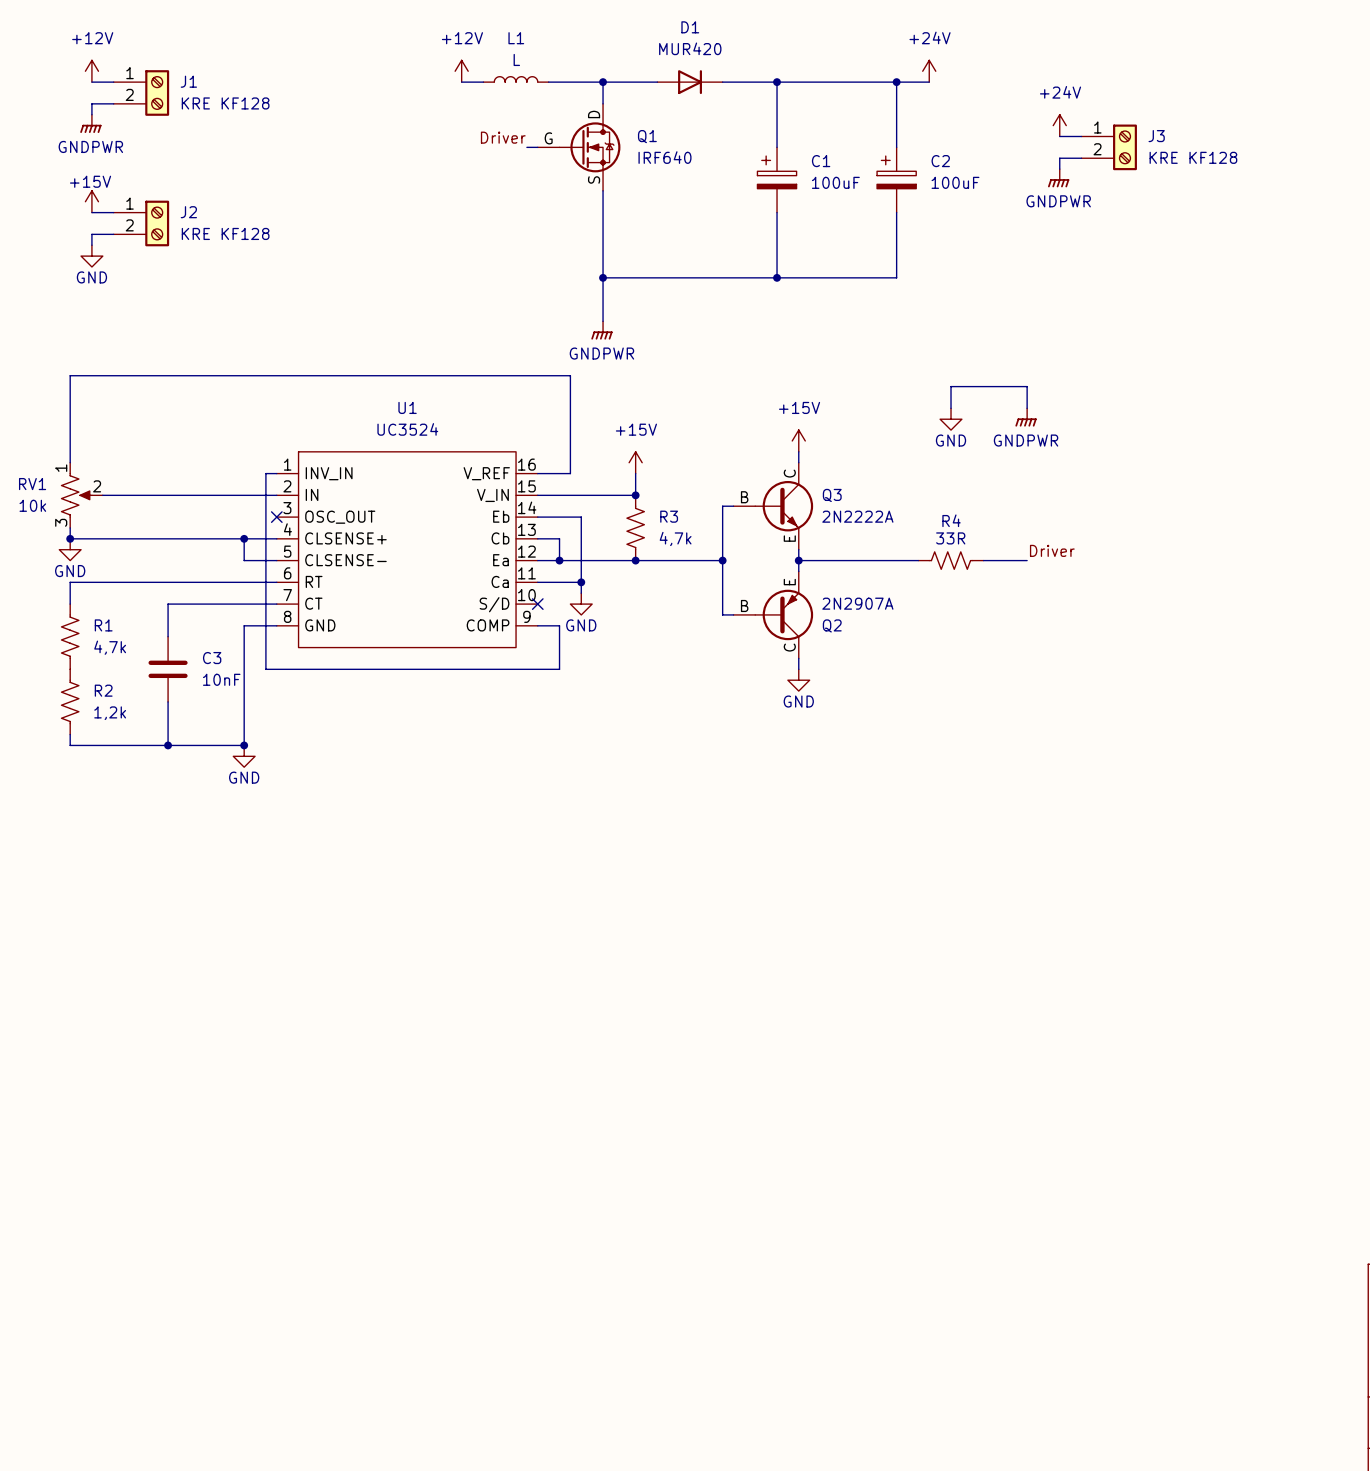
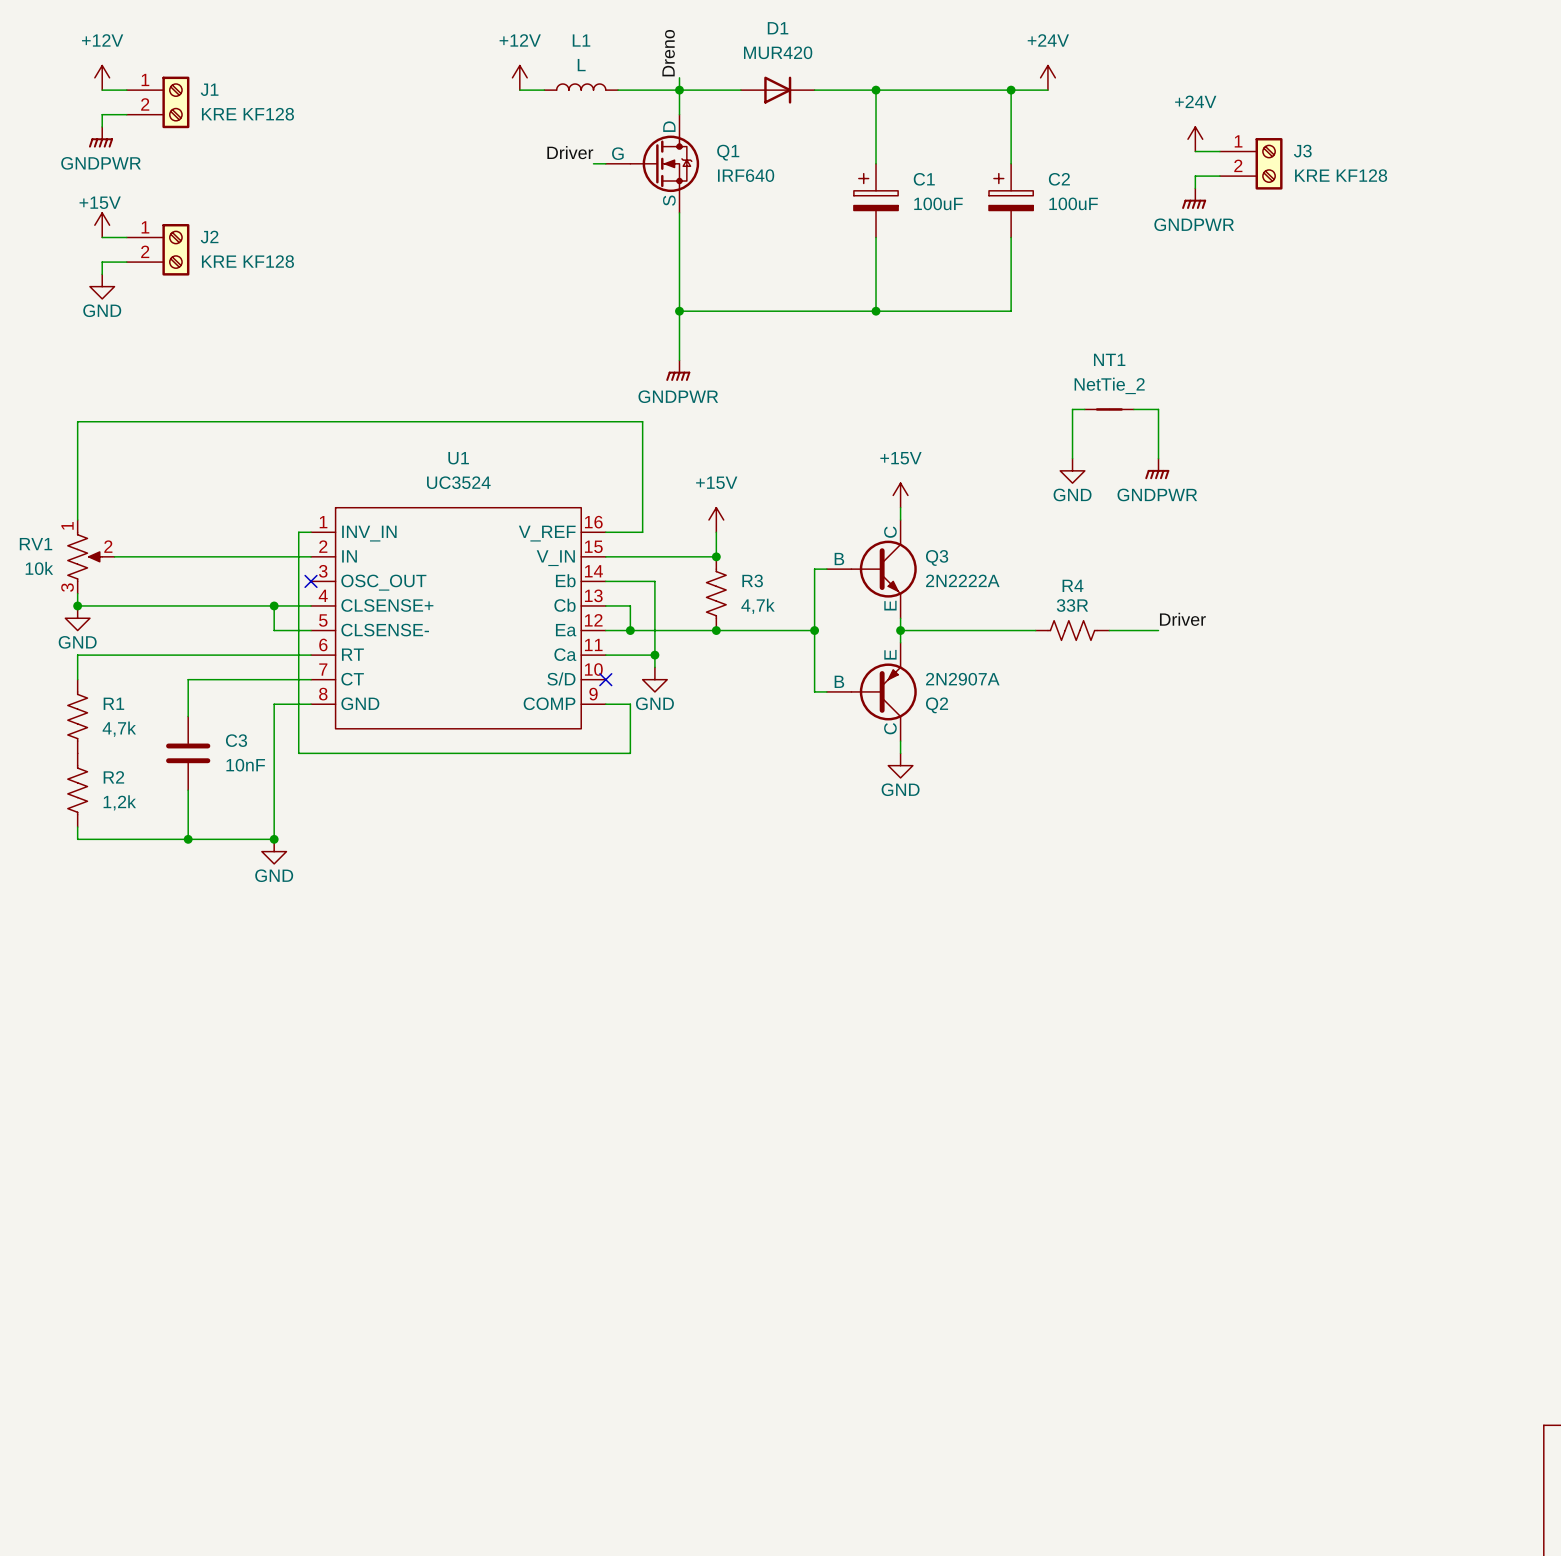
label: none -> Dreno (668, 53)
wire: none -> (679, 77) (679, 90)
wire: none -> (1084, 409) (1072, 409) (1072, 434)
NT1: none -> NetTie_2 (1109, 409)
wire: (951, 386) (1027, 386) -> (1133, 409) (1158, 409) (1158, 434)

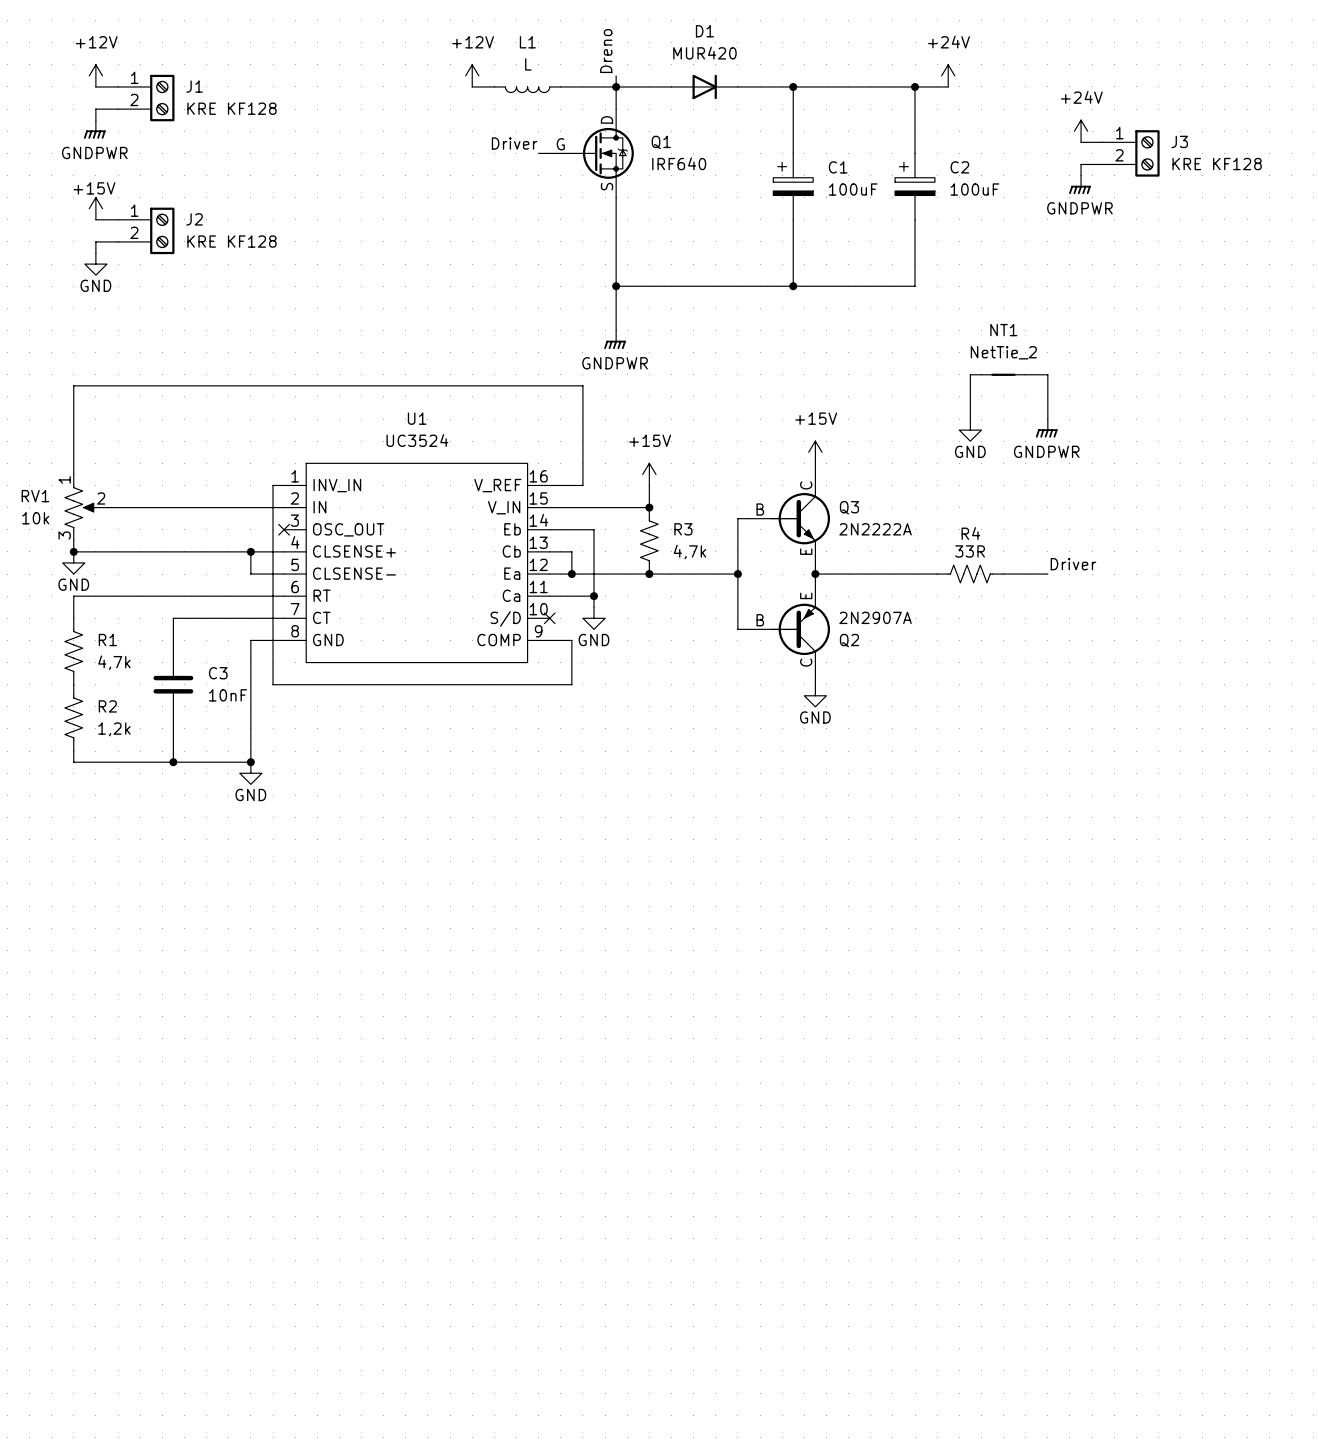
L1 rotation: 0° (581, 87) -> 180° (527, 89)

